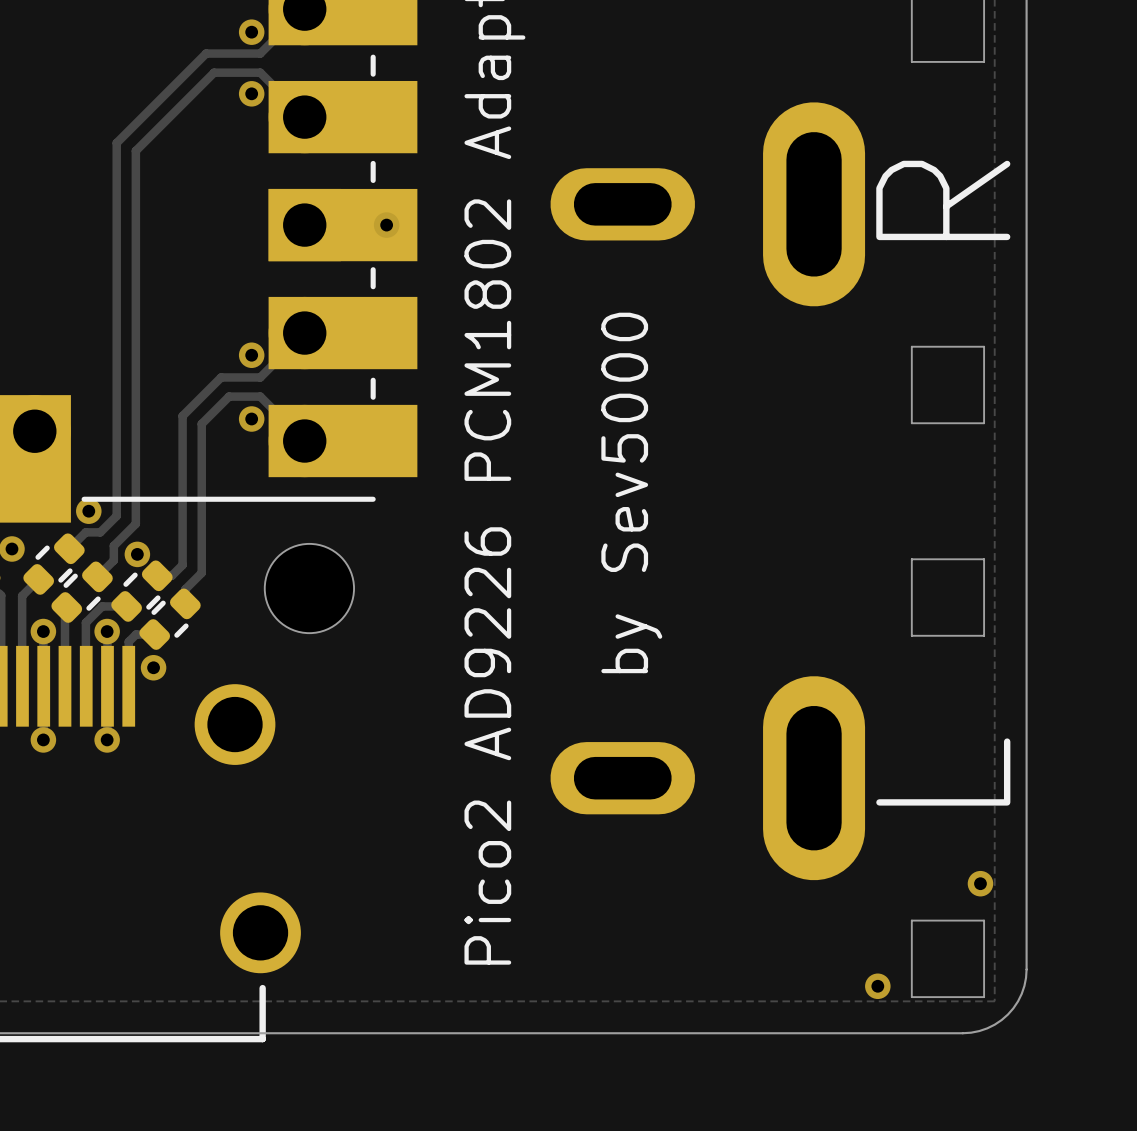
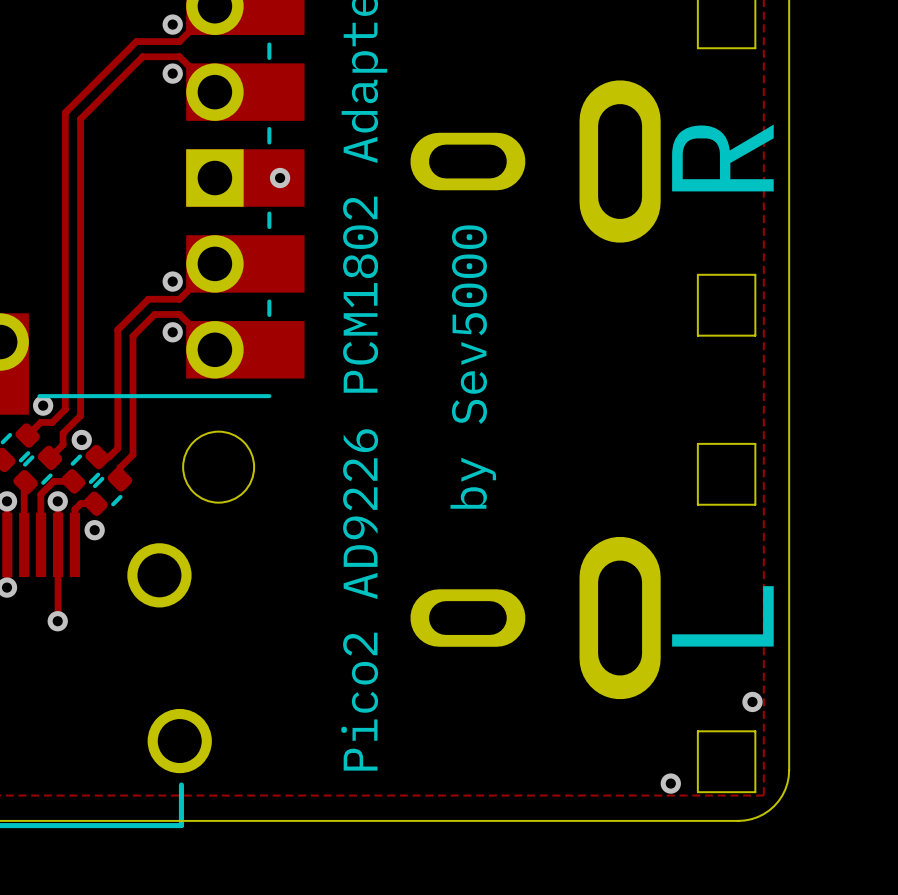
track: none -> (58, 587) (58, 612)
via position: (107, 739) -> (57, 621)

